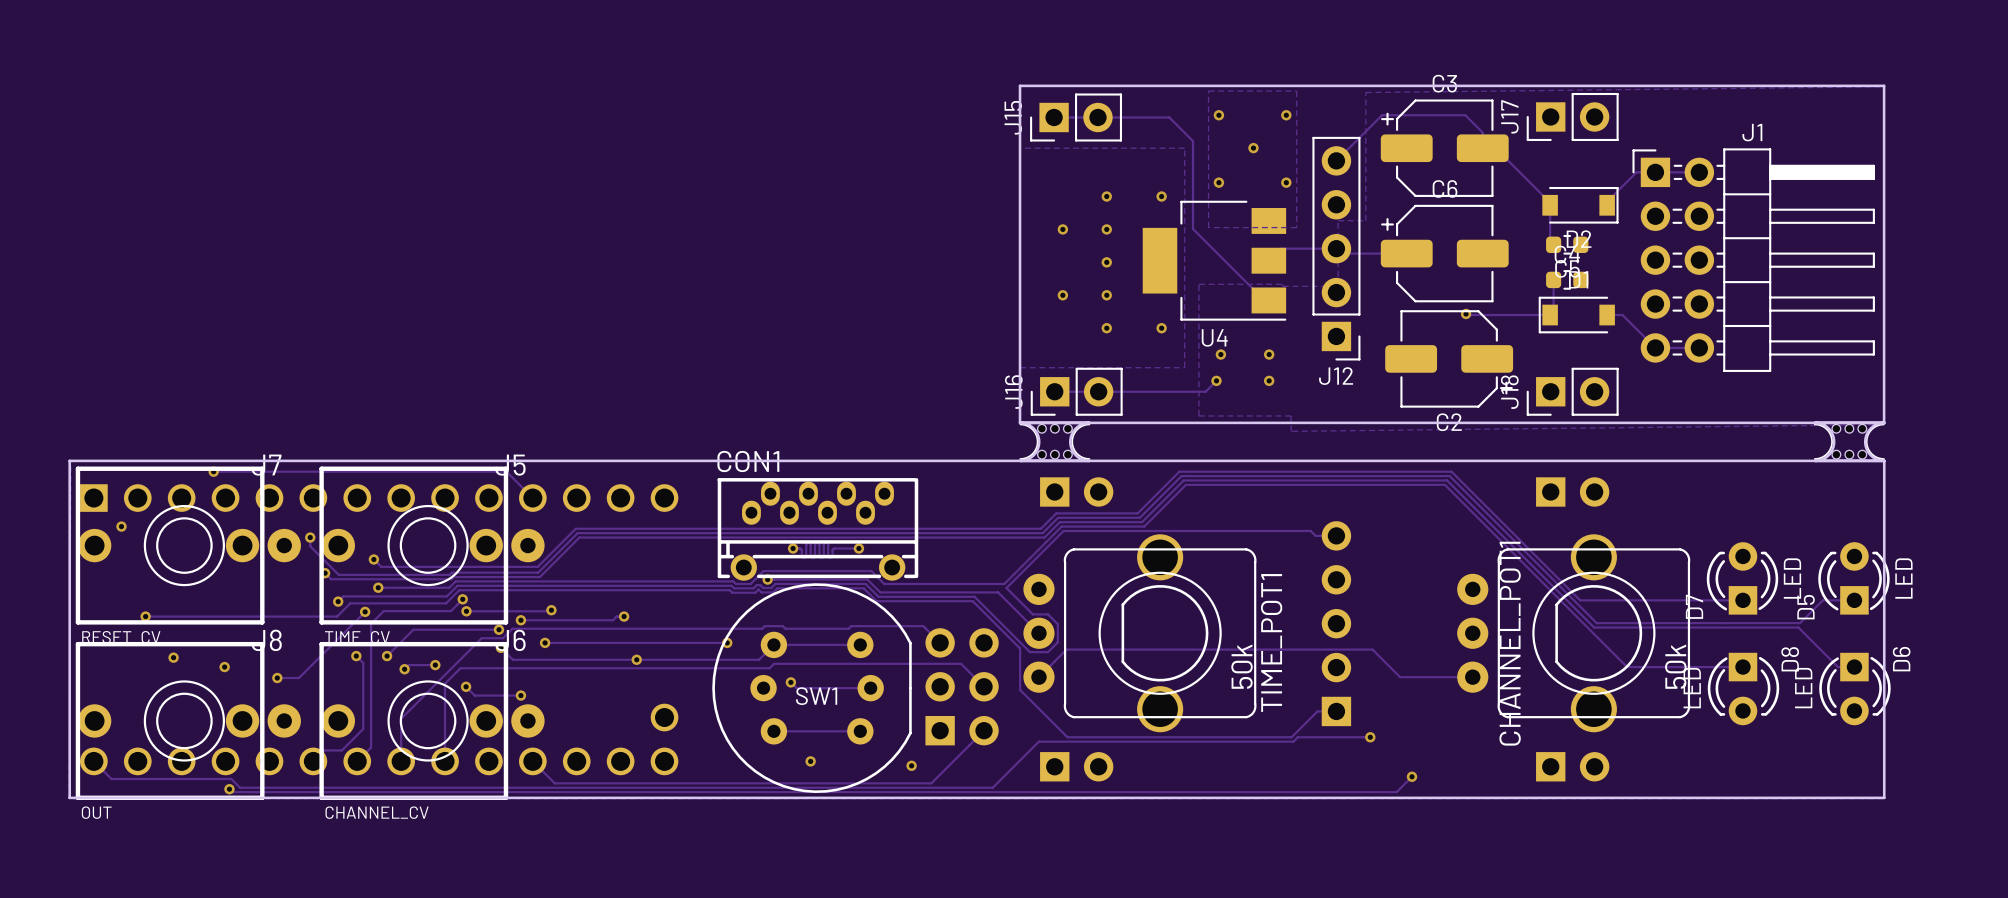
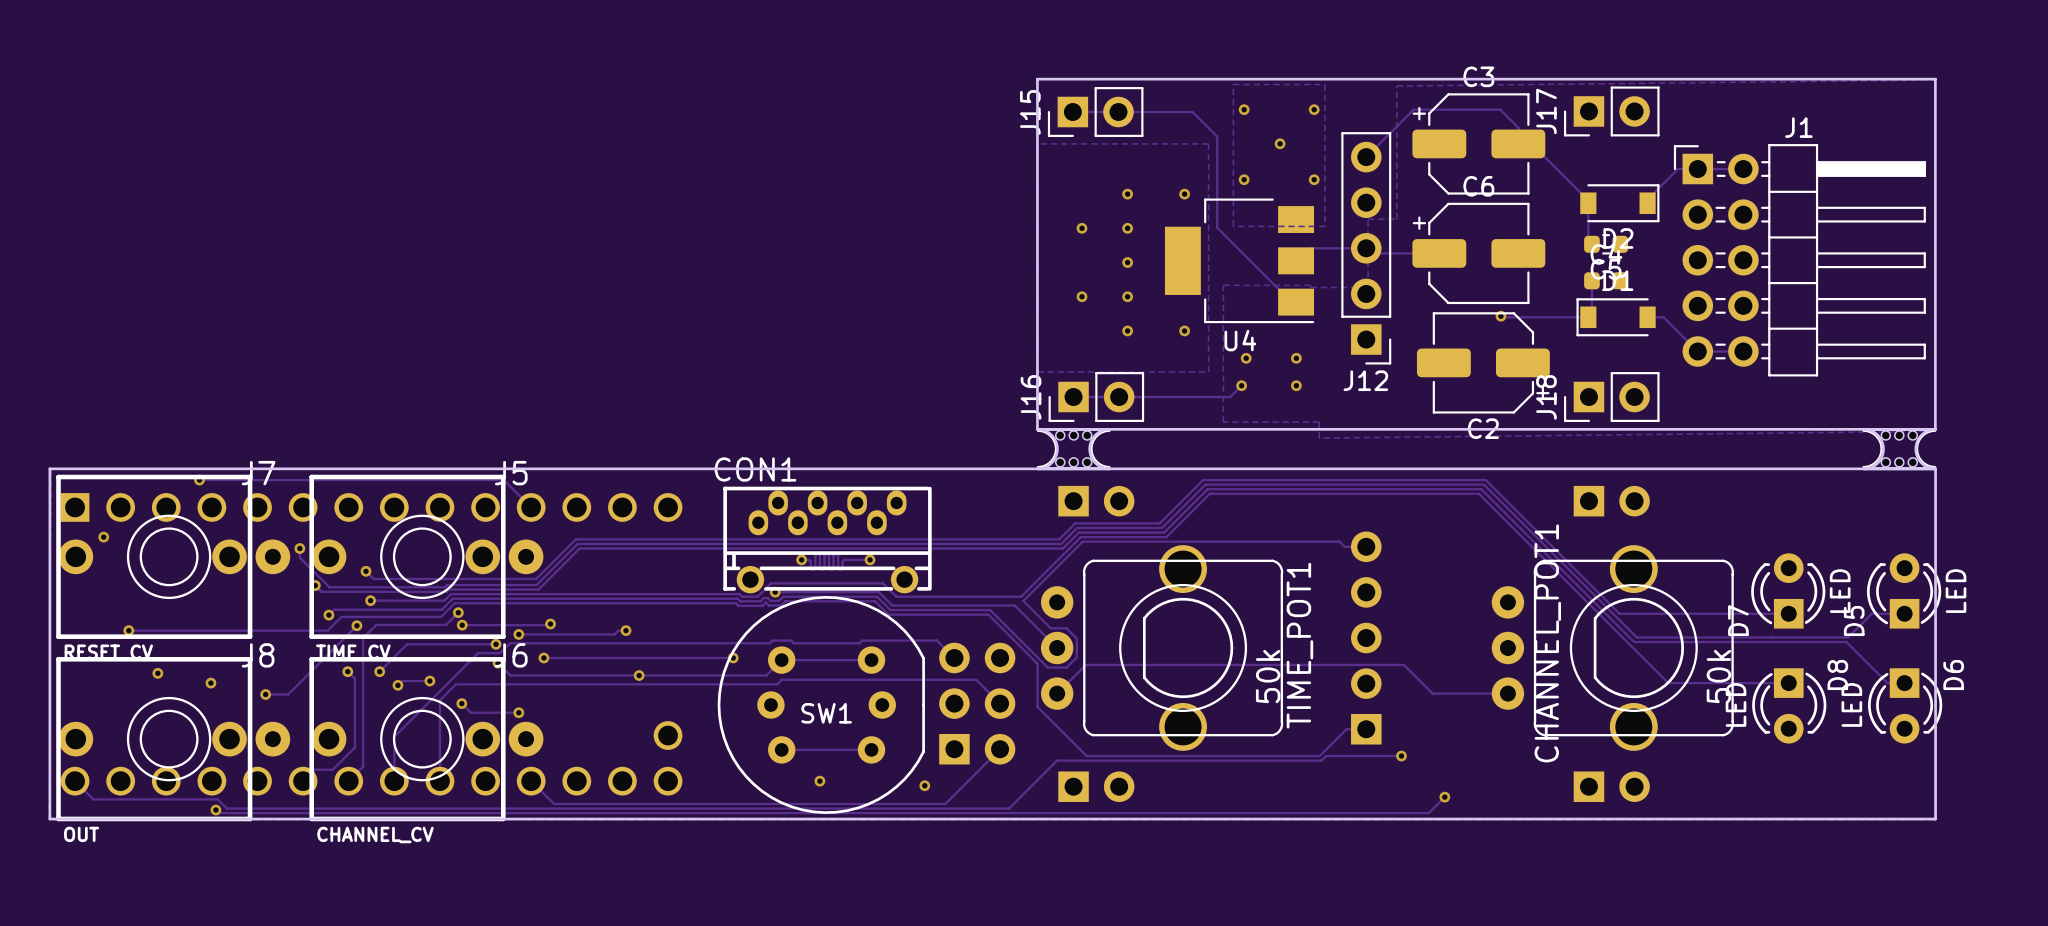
track: (790, 682) (796, 688) (870, 688) -> none
via: (790, 682) -> none

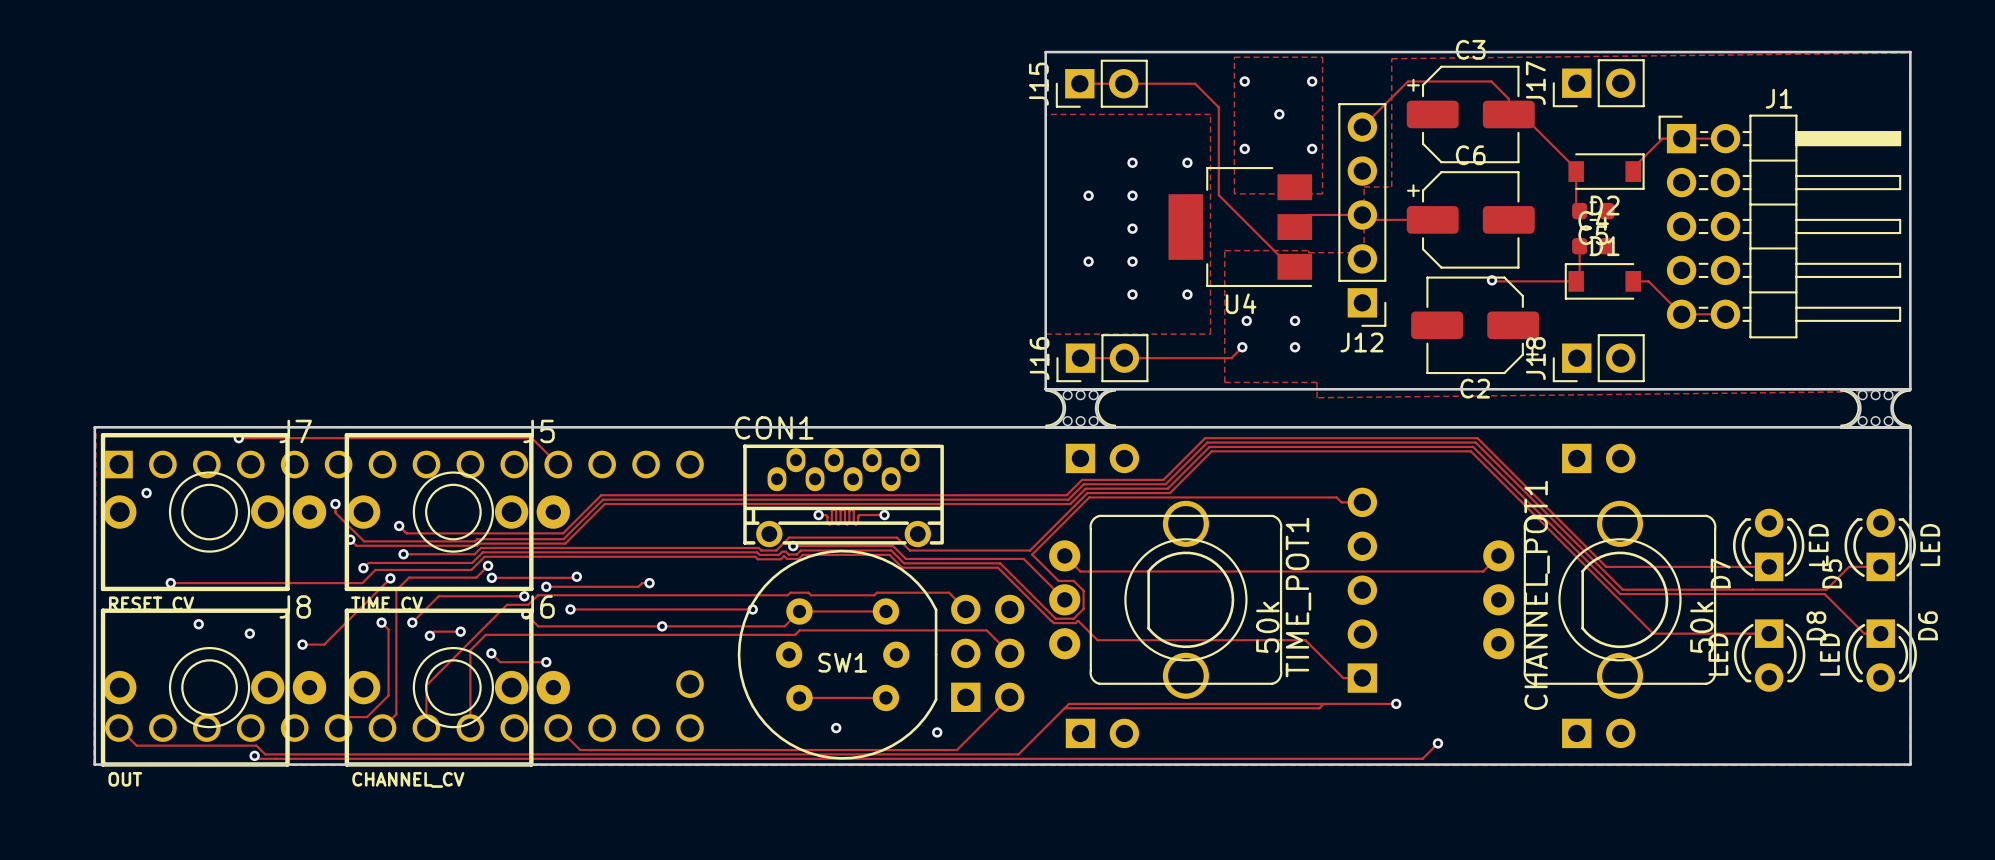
track: none -> (1064, 555) (1080, 571) (1483, 571) (1498, 555)
track: (987, 614) (1037, 663) (1037, 706) (1086, 756) -> (1064, 708) (1069, 703) (1093, 703)
track: none -> (998, 567) (1053, 623) (1075, 623) (1078, 621) (1097, 640) (1305, 640) (1343, 678)
track: (1057, 693) (1085, 664) (1403, 664) (1432, 693) (1507, 693) -> none
track: (1346, 729) (1319, 756) -> (1323, 703) (1317, 703)

